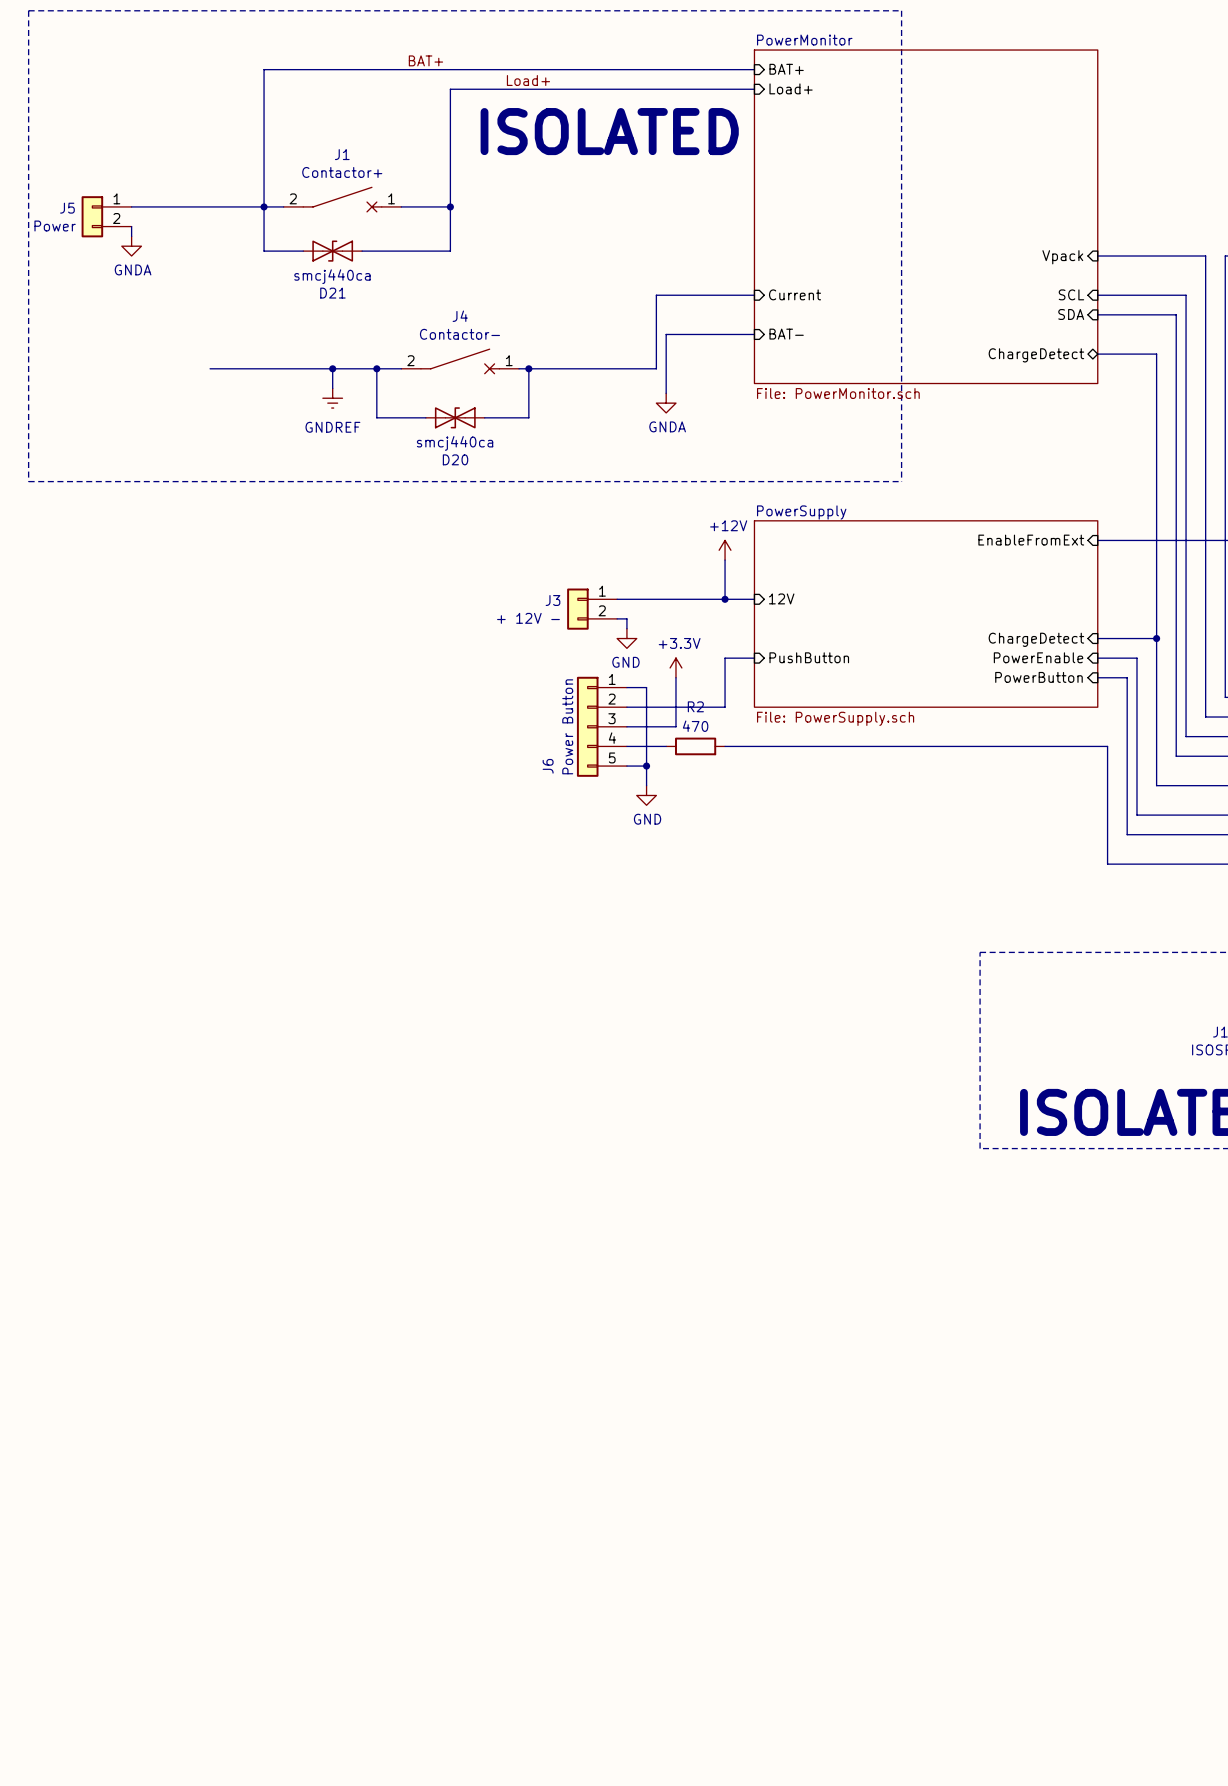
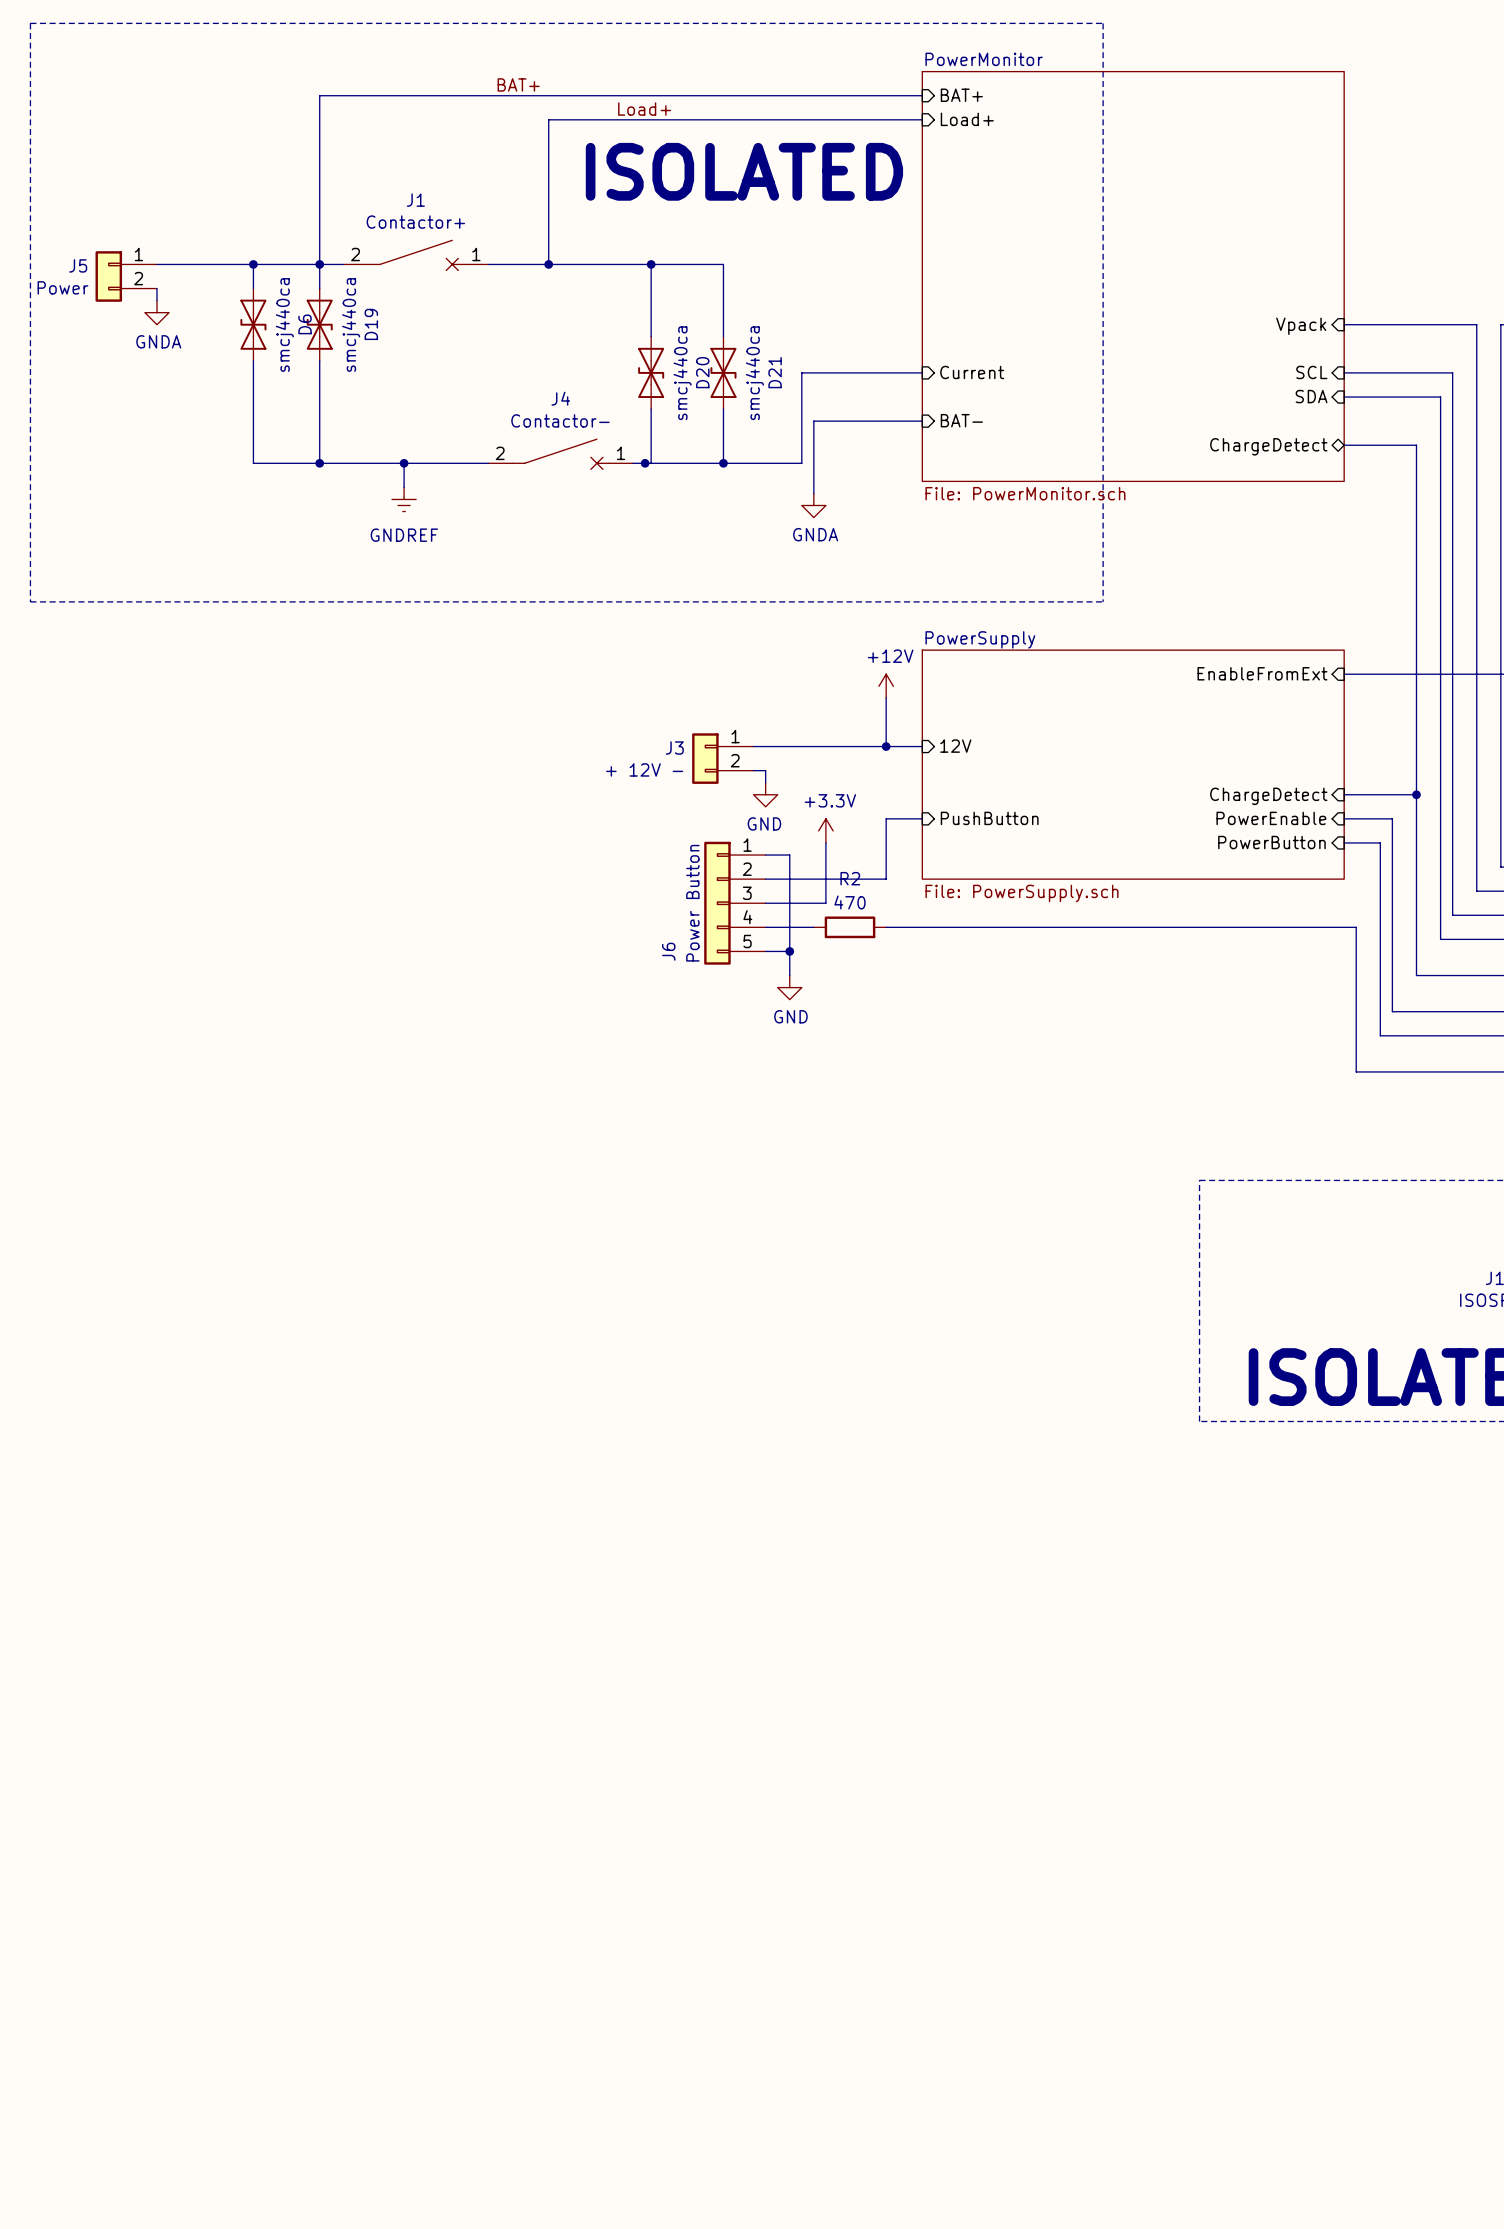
wire: none -> (253, 264) (253, 288)
junction: none -> (253, 264)
wire: (450, 206) (450, 251) (362, 251) -> (548, 264) (723, 264) (723, 336)
wire: none -> (651, 264) (651, 336)
junction: none -> (651, 264)
wire: (264, 226) (264, 251) (303, 251) -> none
D21 rotation: 0° (332, 251) -> 90° clockwise (723, 372)
D21 position: (332, 251) -> (723, 372)
D6: none -> smcj440ca (253, 324)
D19: none -> smcj440ca (319, 324)
D21 value position: smcj440ca (332, 276) -> smcj440ca (754, 373)
wire: none -> (253, 360) (253, 463)
wire: none -> (319, 360) (319, 463)
D21 name position: D21 (332, 293) -> D21 (775, 372)
wire: none -> (651, 409) (651, 463)
wire: none -> (723, 409) (723, 463)
junction: none -> (319, 463)
wire: (376, 368) (376, 417) (425, 417) -> none
junction: (376, 368) -> none
wire: (528, 368) (528, 417) (484, 417) -> none
junction: none -> (723, 463)
D20 rotation: 0° (455, 417) -> 90° clockwise (651, 372)
D20 position: (455, 417) -> (651, 372)
D20 value position: smcj440ca (455, 443) -> smcj440ca (682, 373)
D20 name position: D20 (455, 459) -> D20 (702, 372)

